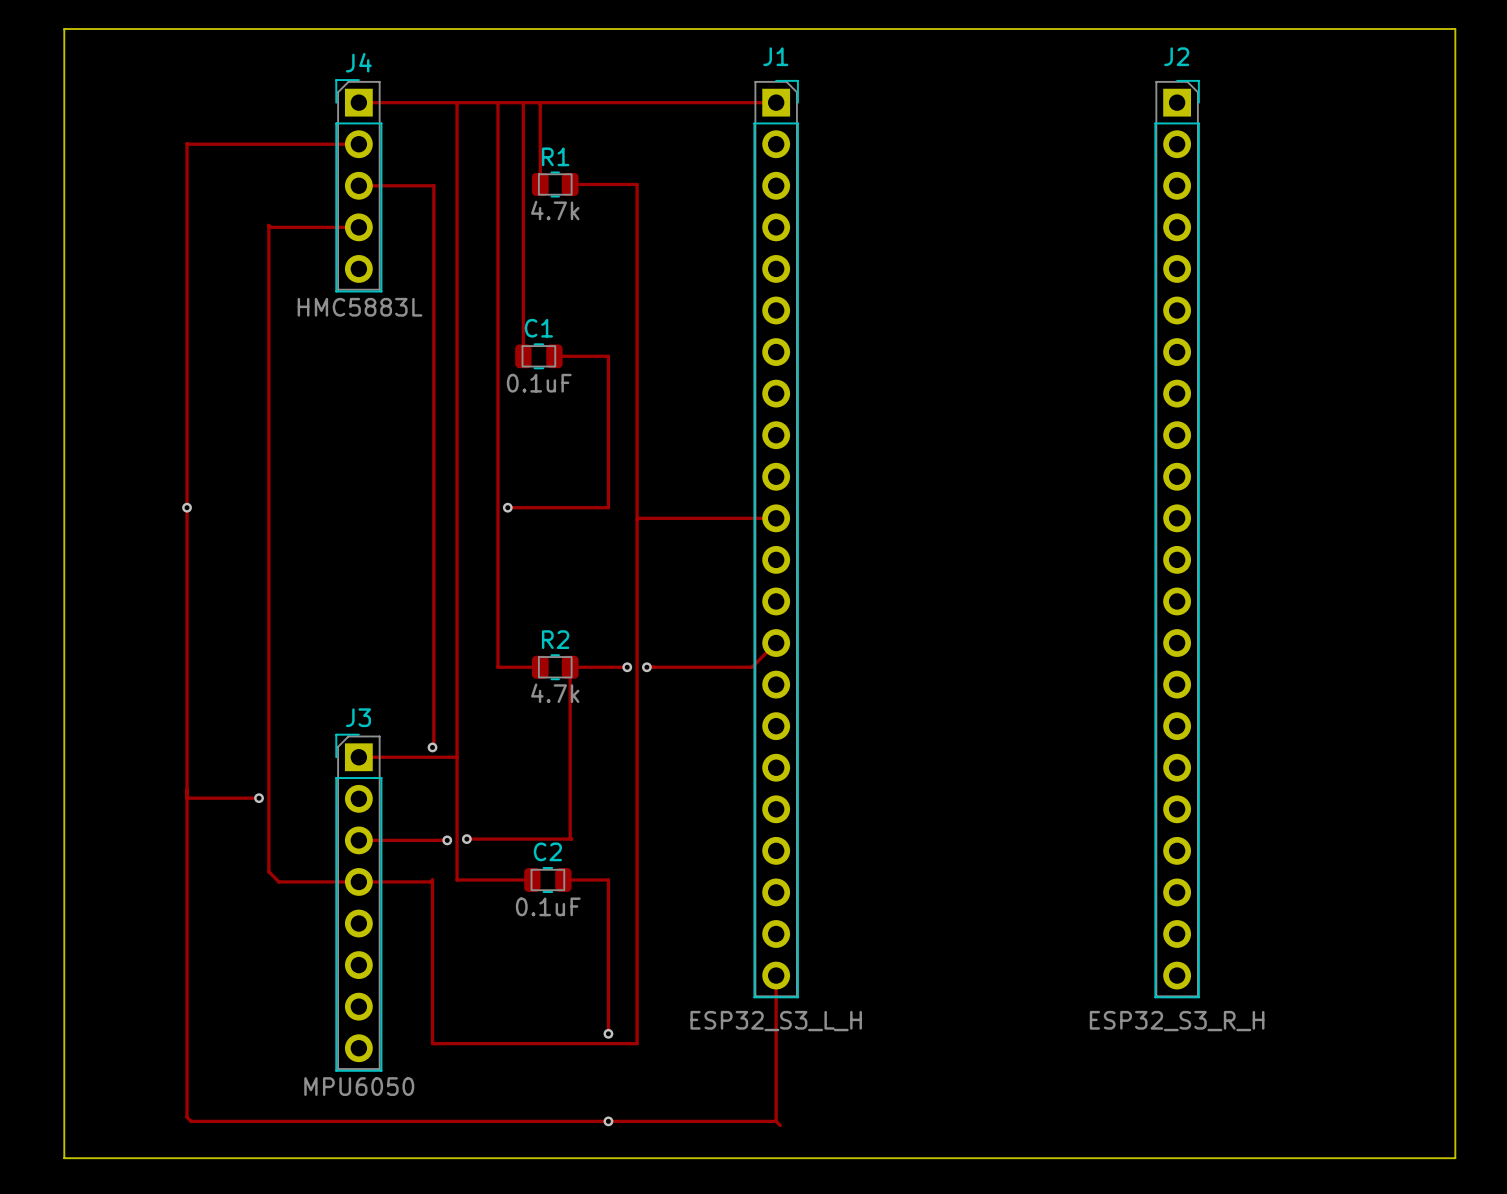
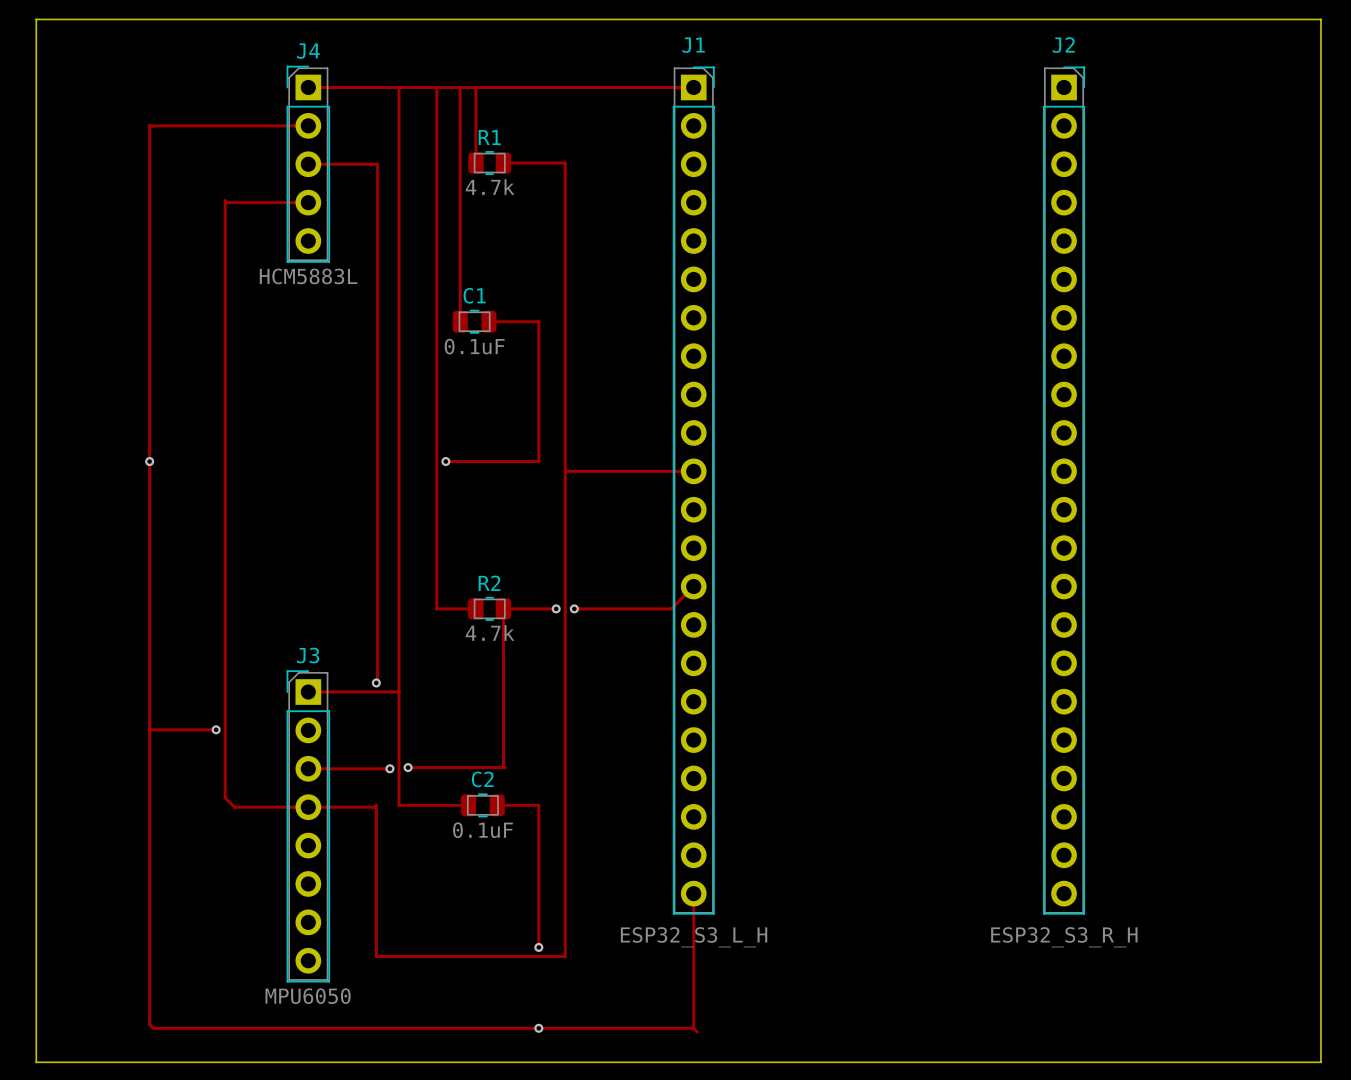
J4 value: HMC5883L (360, 307) -> HCM5883L (308, 276)

